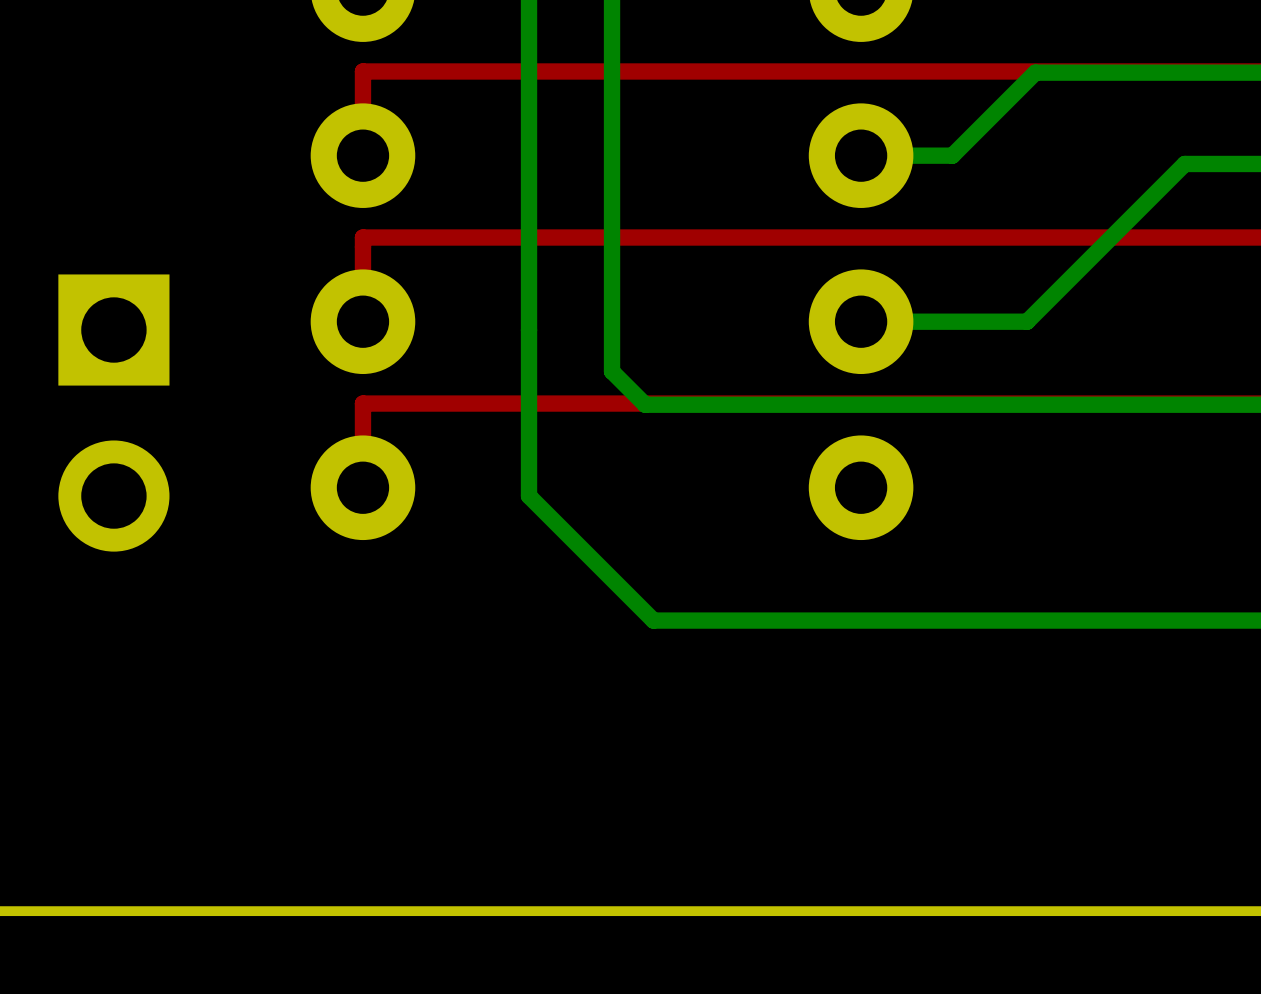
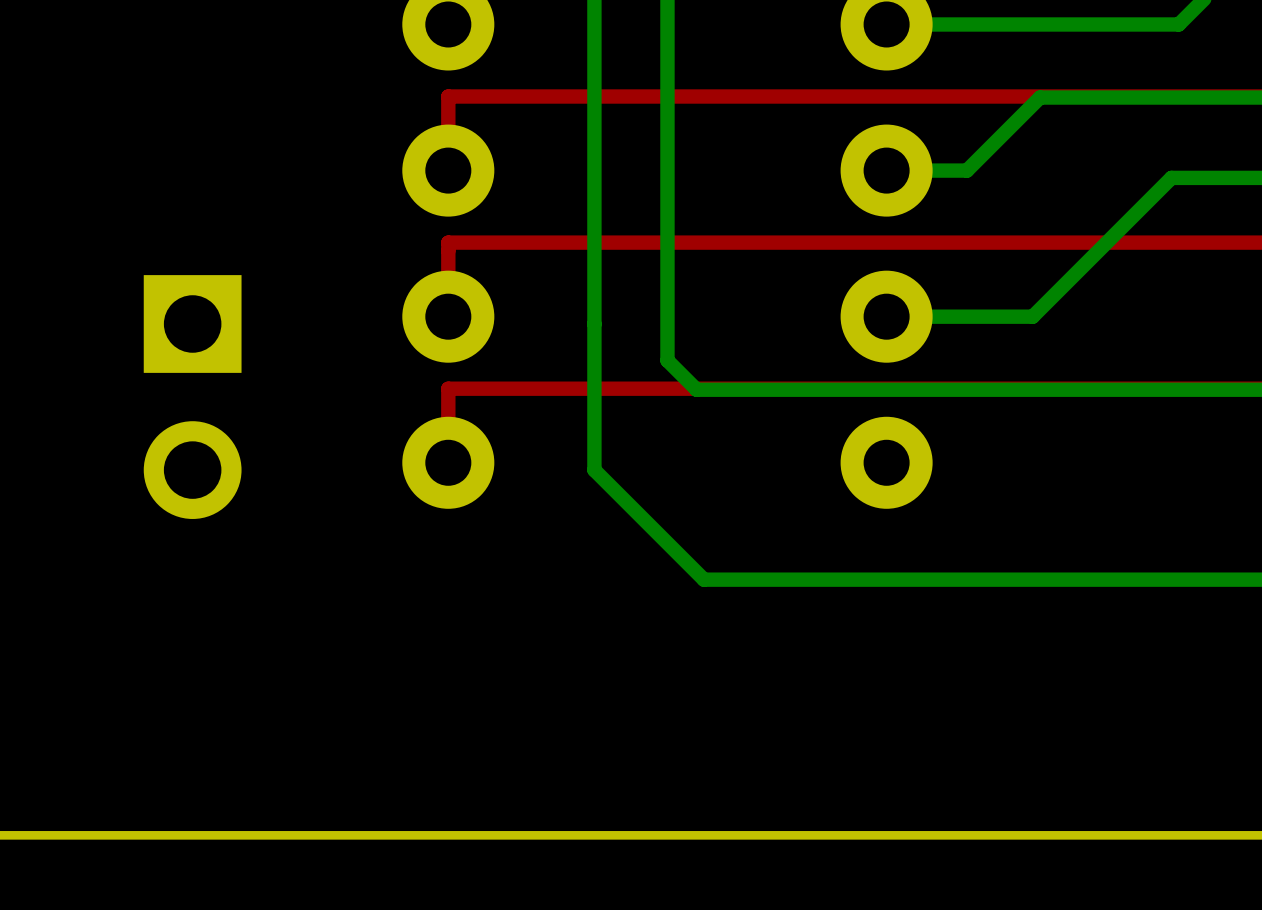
part position: (113, 413) -> (192, 397)

